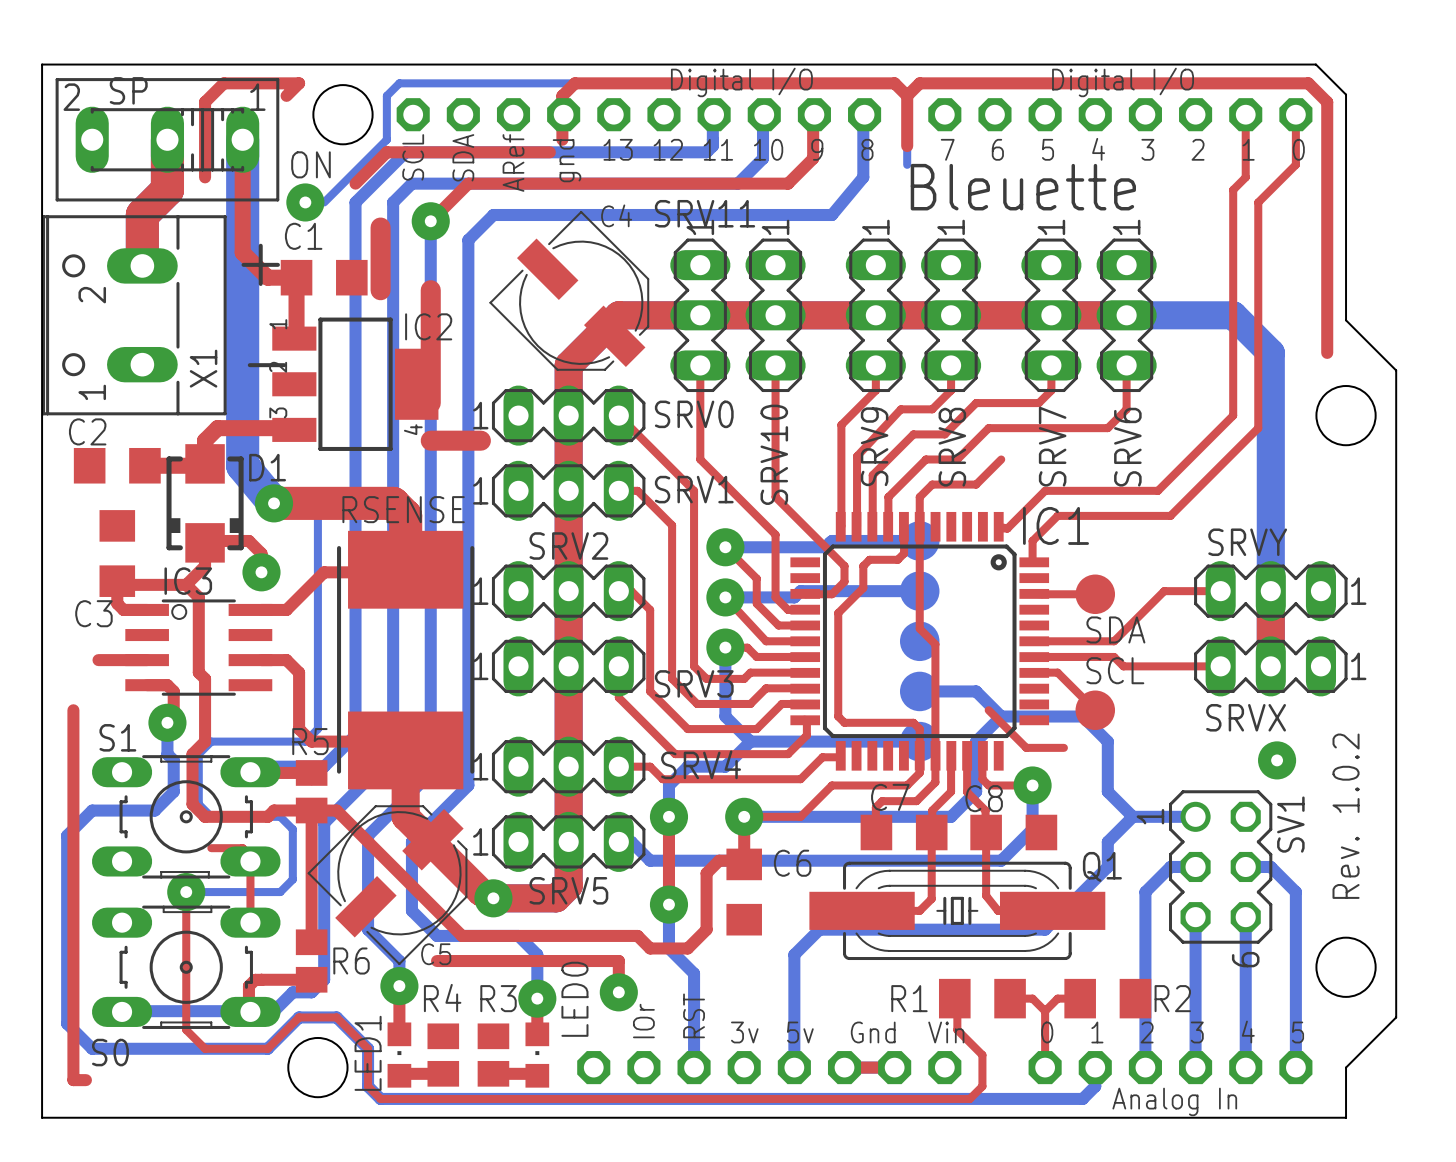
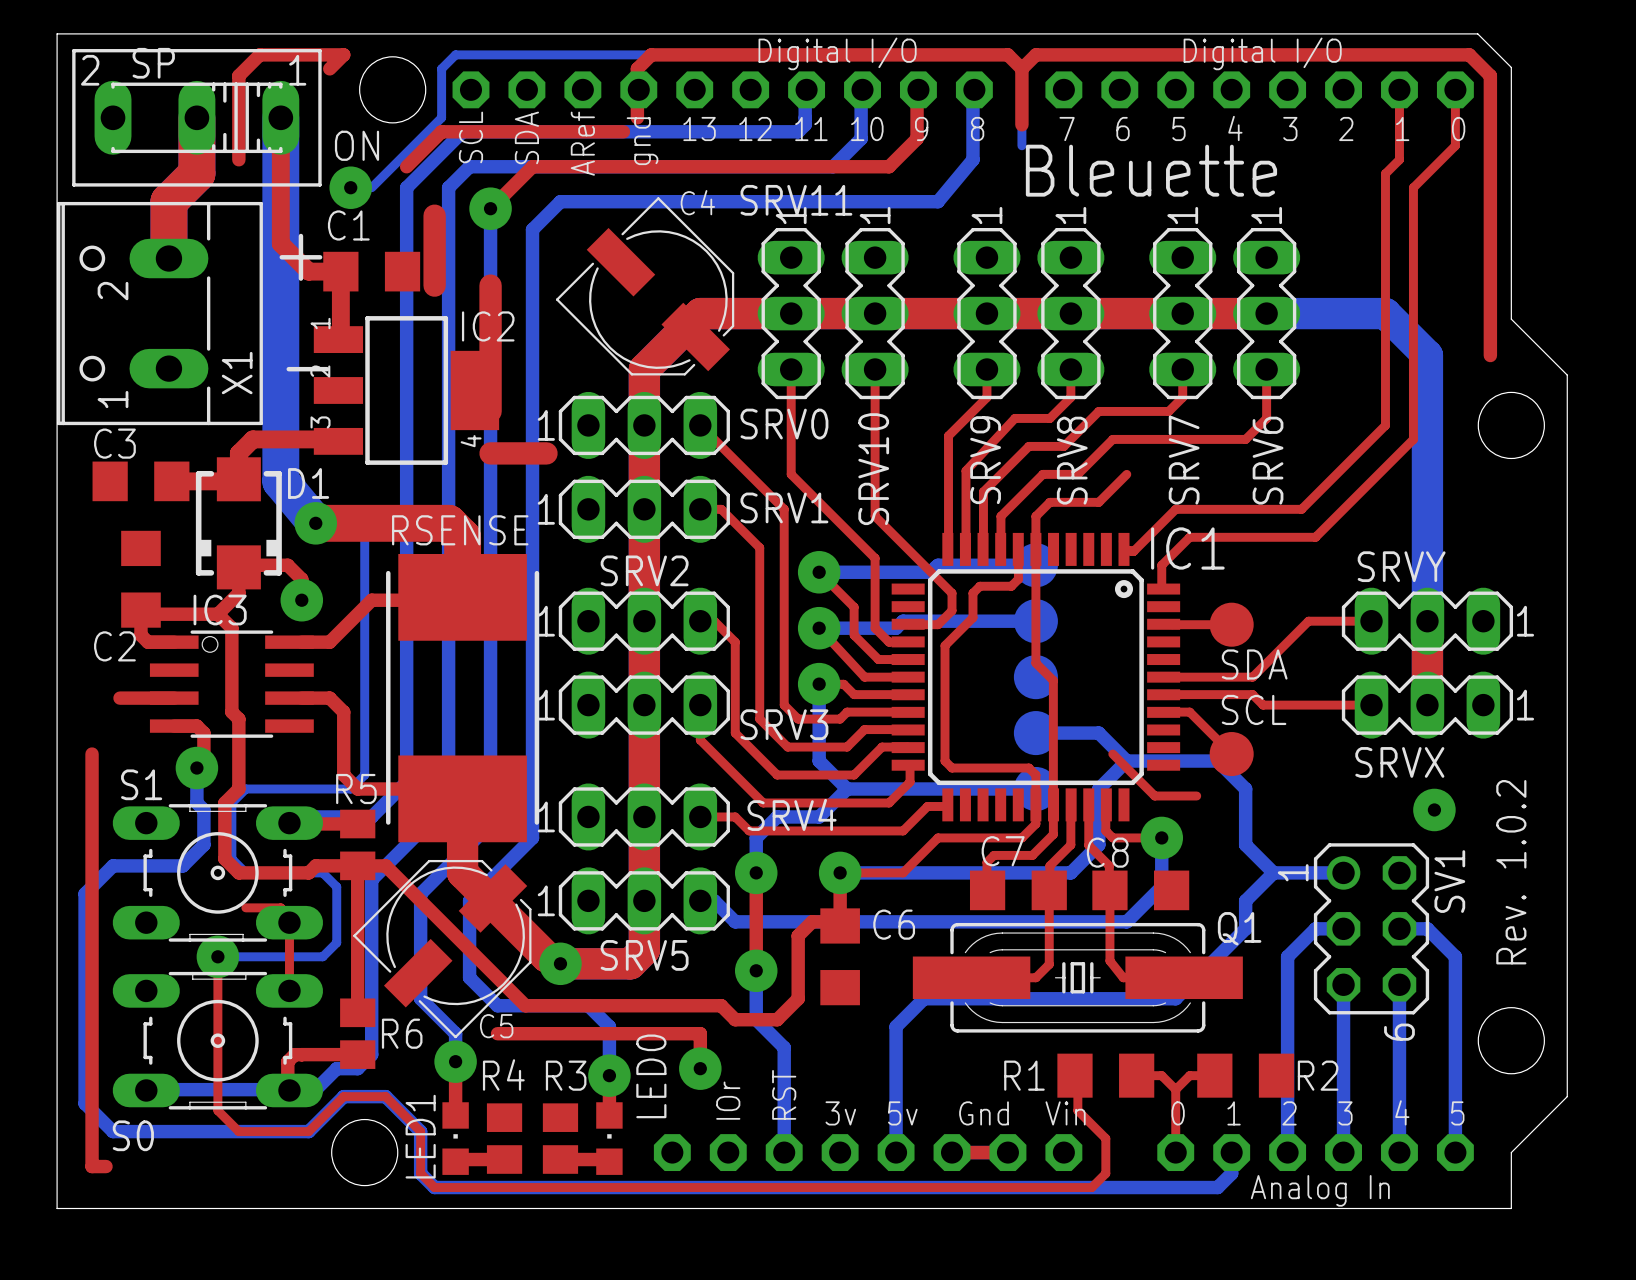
C2 name position: C2 (87, 431) -> C2 (114, 646)
C3 name position: C3 (93, 613) -> C3 (114, 443)

